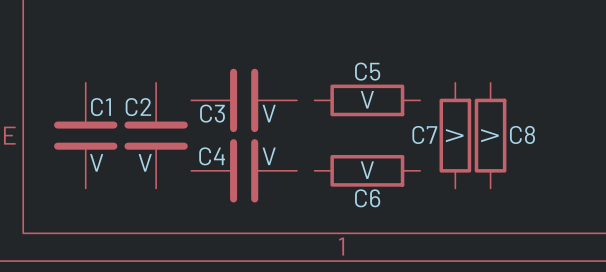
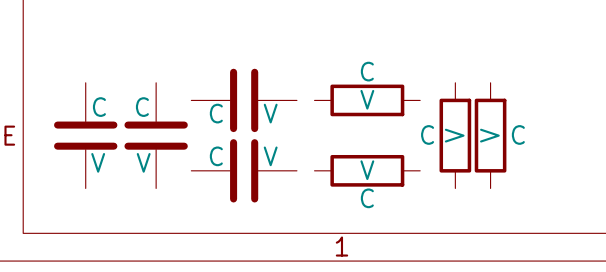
C5 name: C5 (367, 71) -> C (367, 71)
C1 name: C1 (101, 107) -> C (99, 107)
C2 name: C2 (138, 107) -> C (142, 107)
C3 name: C3 (212, 113) -> C (216, 113)
C7 name: C7 (424, 134) -> C (427, 134)
C8 name: C8 (522, 134) -> C (518, 134)
C4 name: C4 (212, 156) -> C (216, 156)
C6 name: C6 (367, 198) -> C (367, 198)

